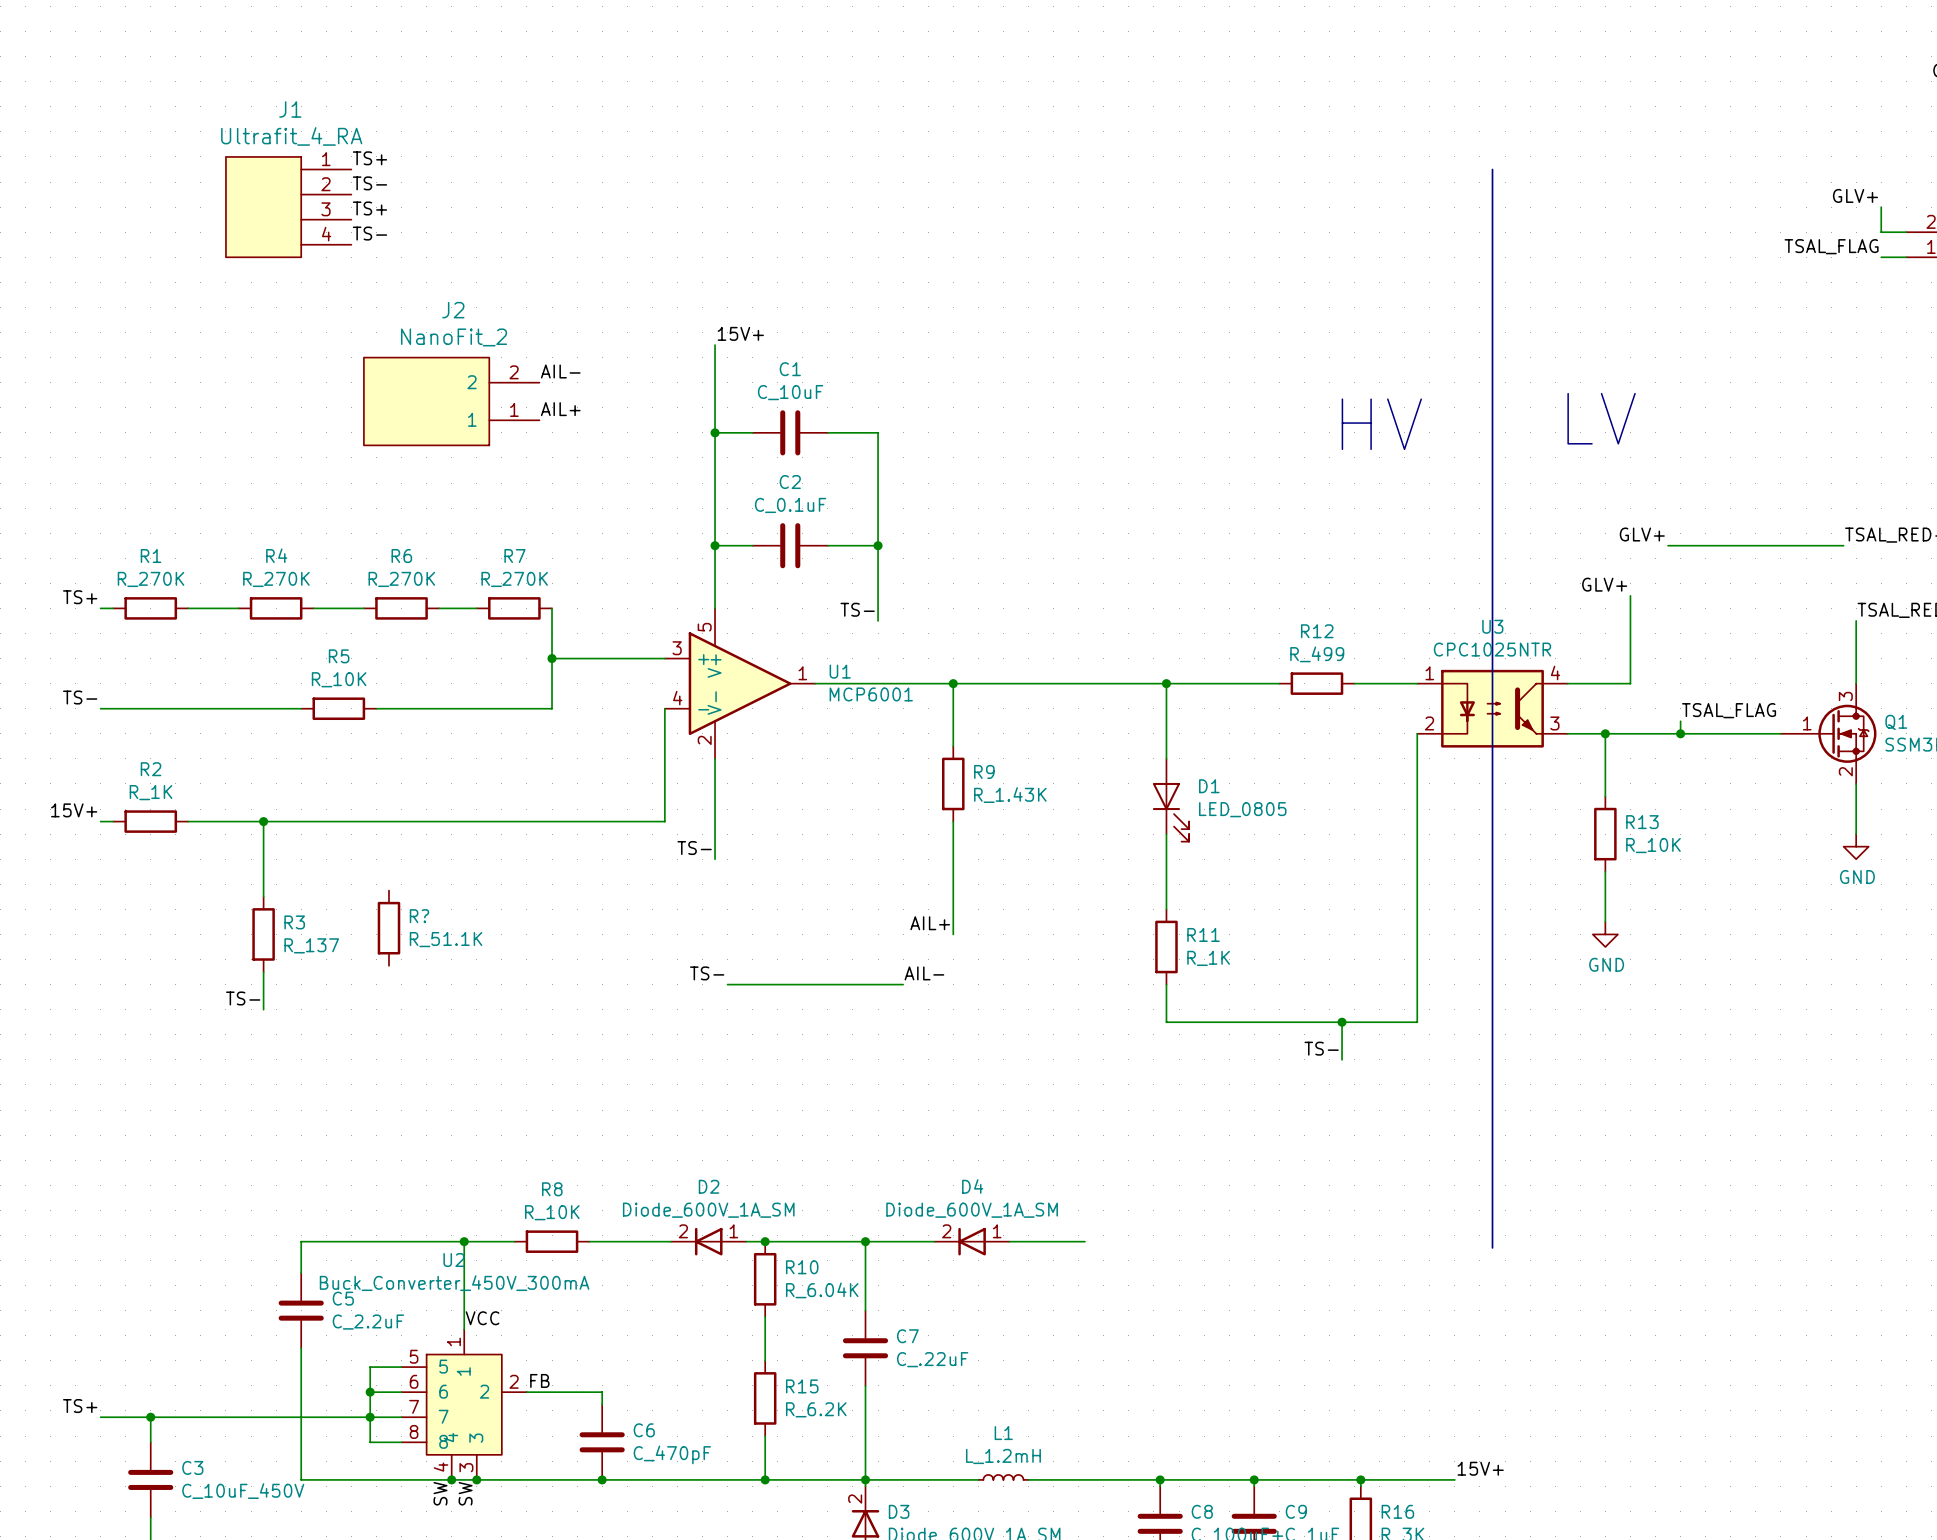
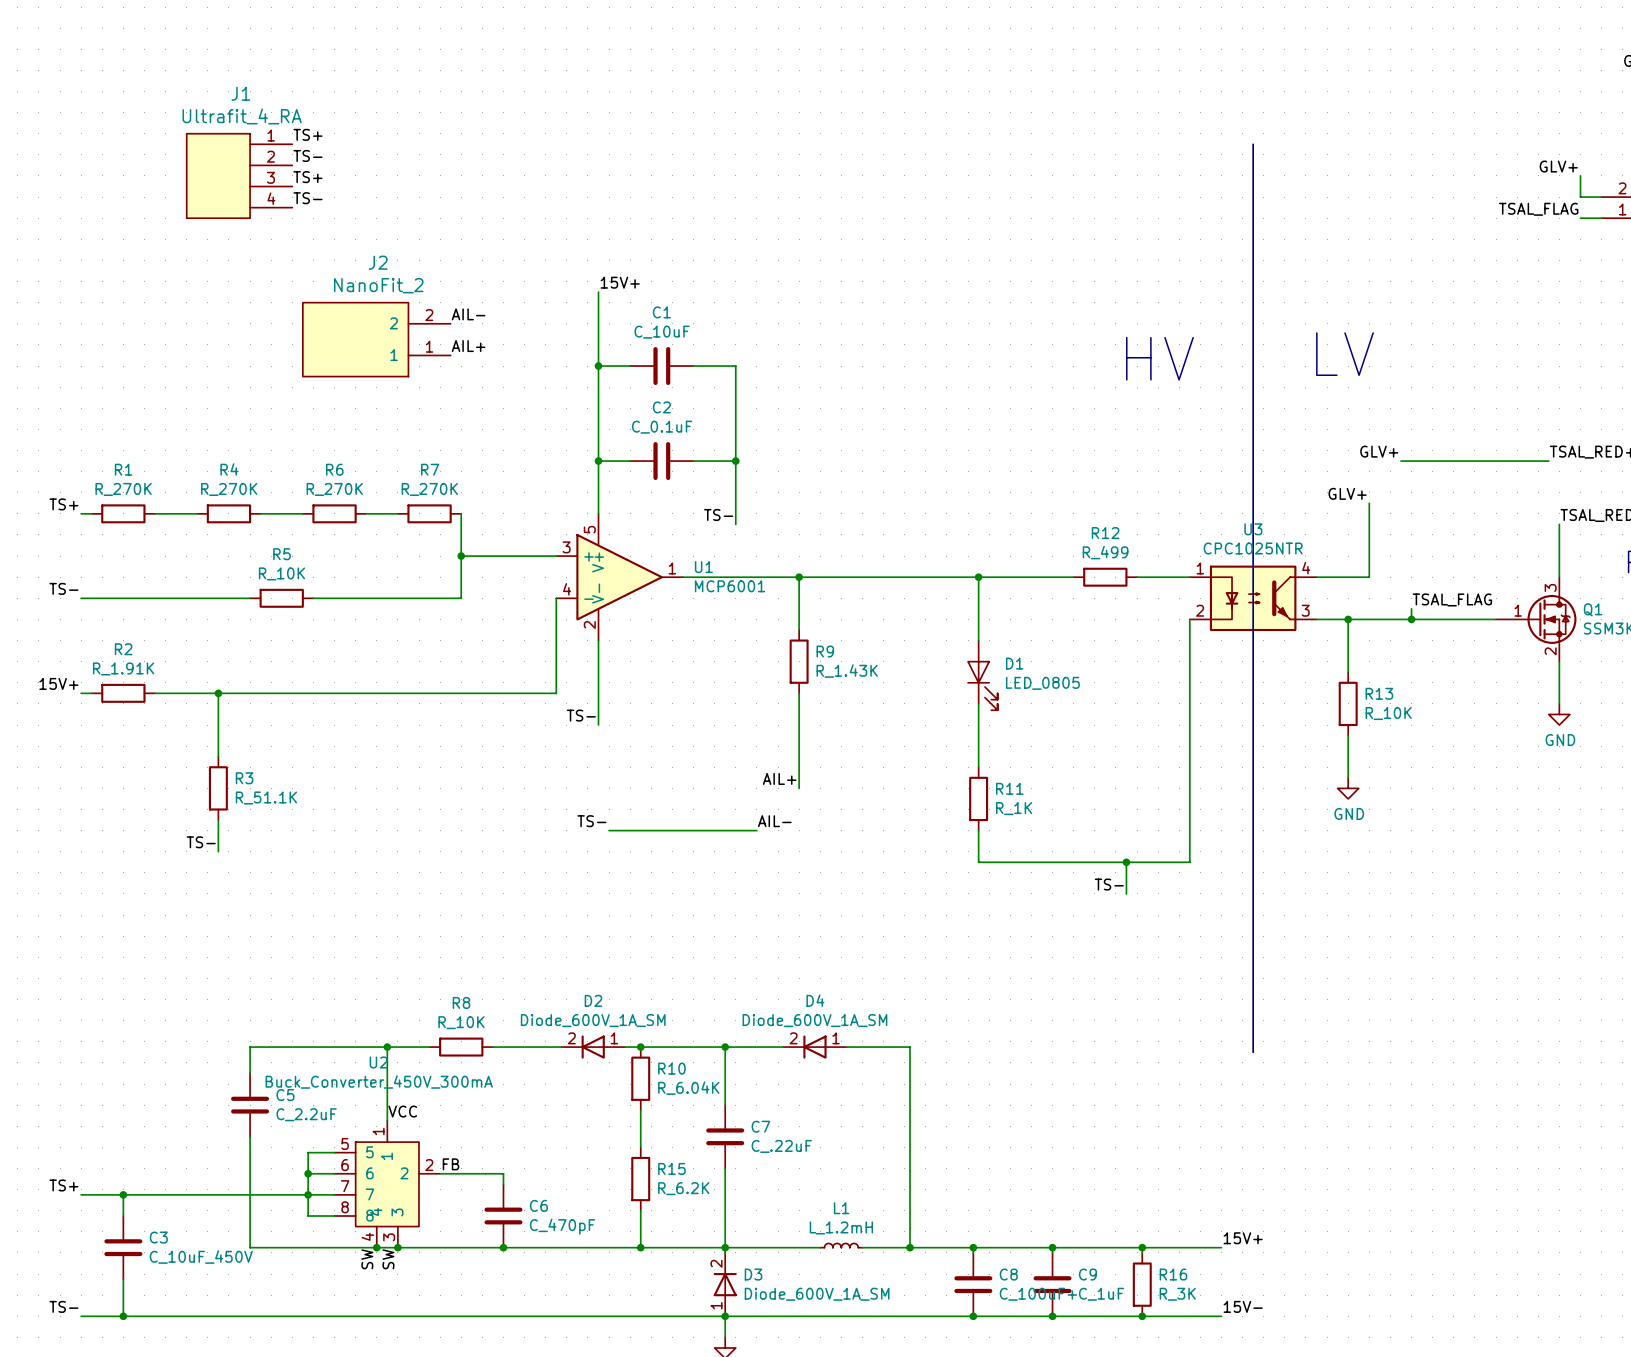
R2 value: R_1K (151, 792) -> R_1.91K (123, 668)
R?: R_51.1K (388, 928) -> none
R3 value: R_137 (311, 945) -> R_51.1K (266, 797)
wire: none -> (909, 1047) (909, 1247)
junction: none -> (909, 1247)

